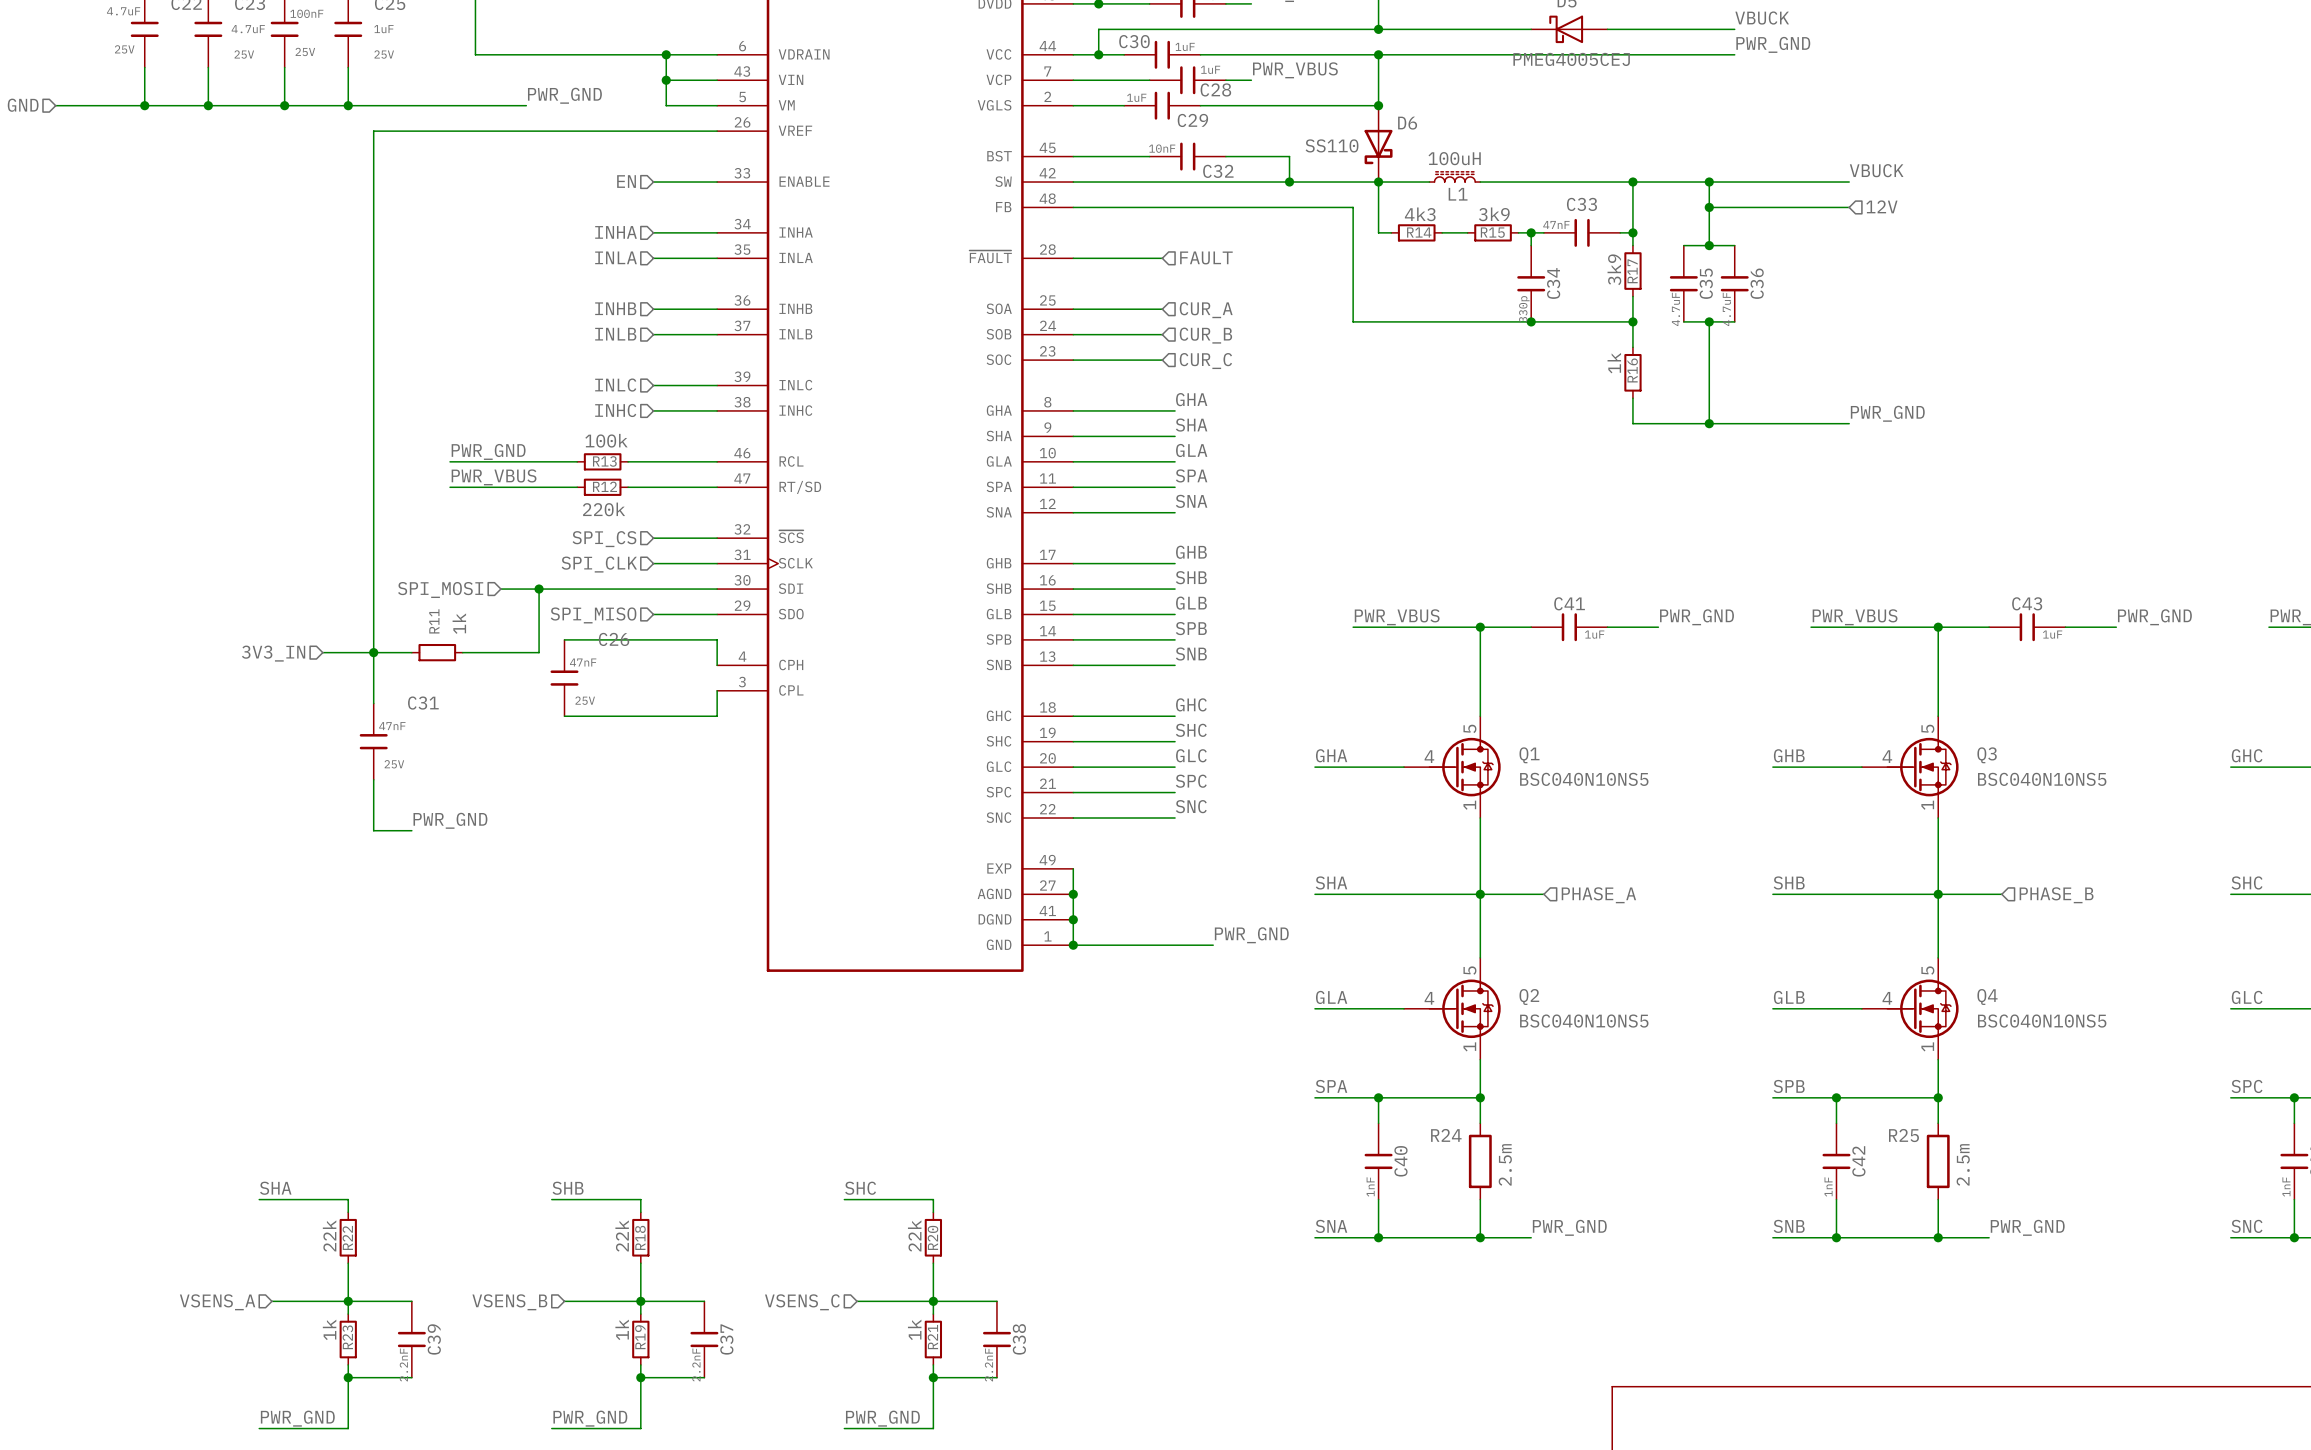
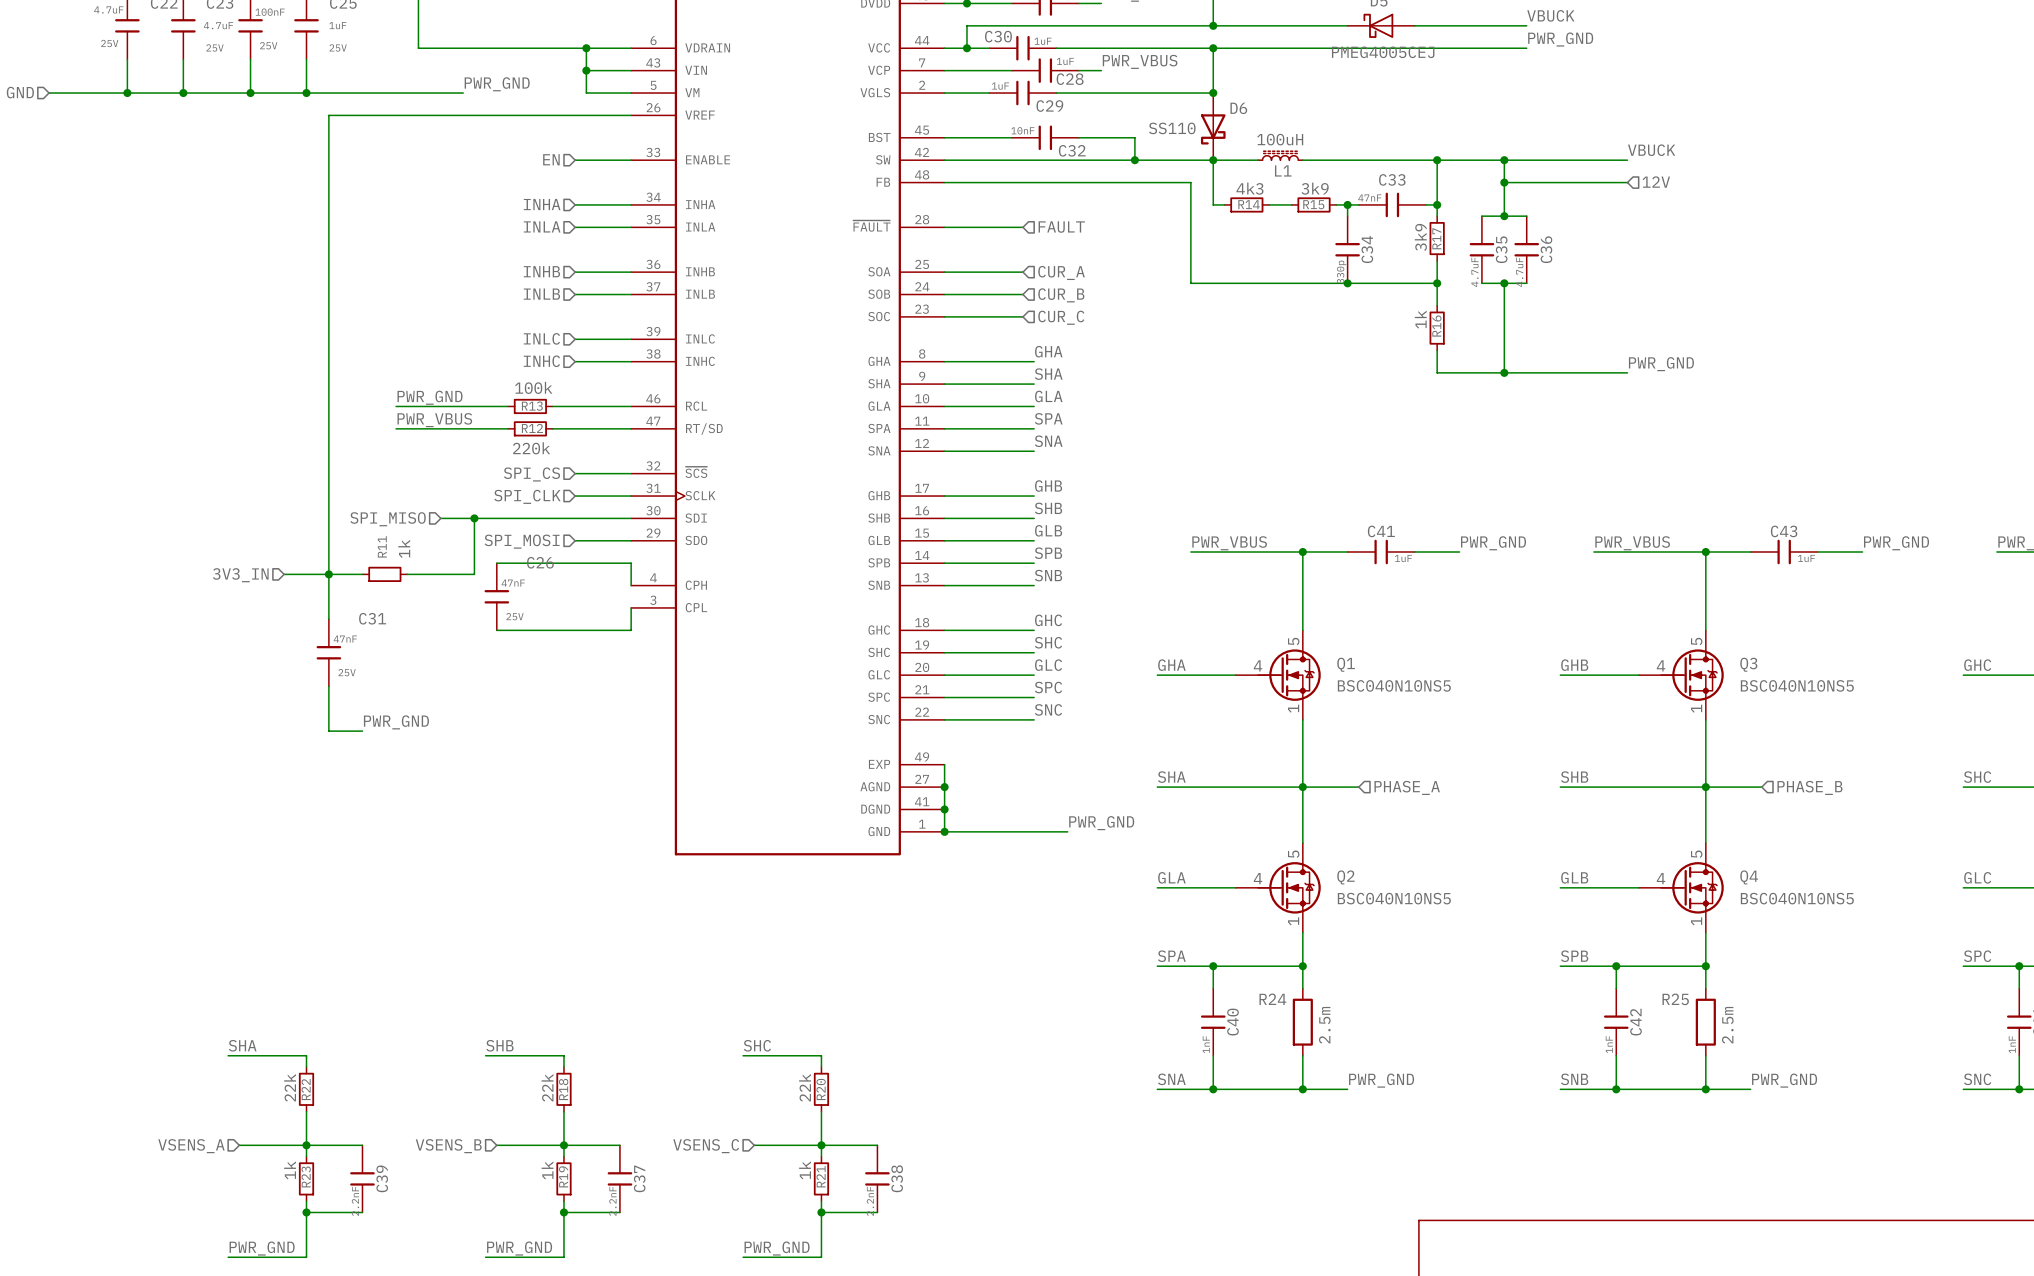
hierarchical label: SPI_MOSI (440, 589) -> SPI_MISO (388, 519)
hierarchical label: SPI_MISO (593, 615) -> SPI_MOSI (522, 541)

